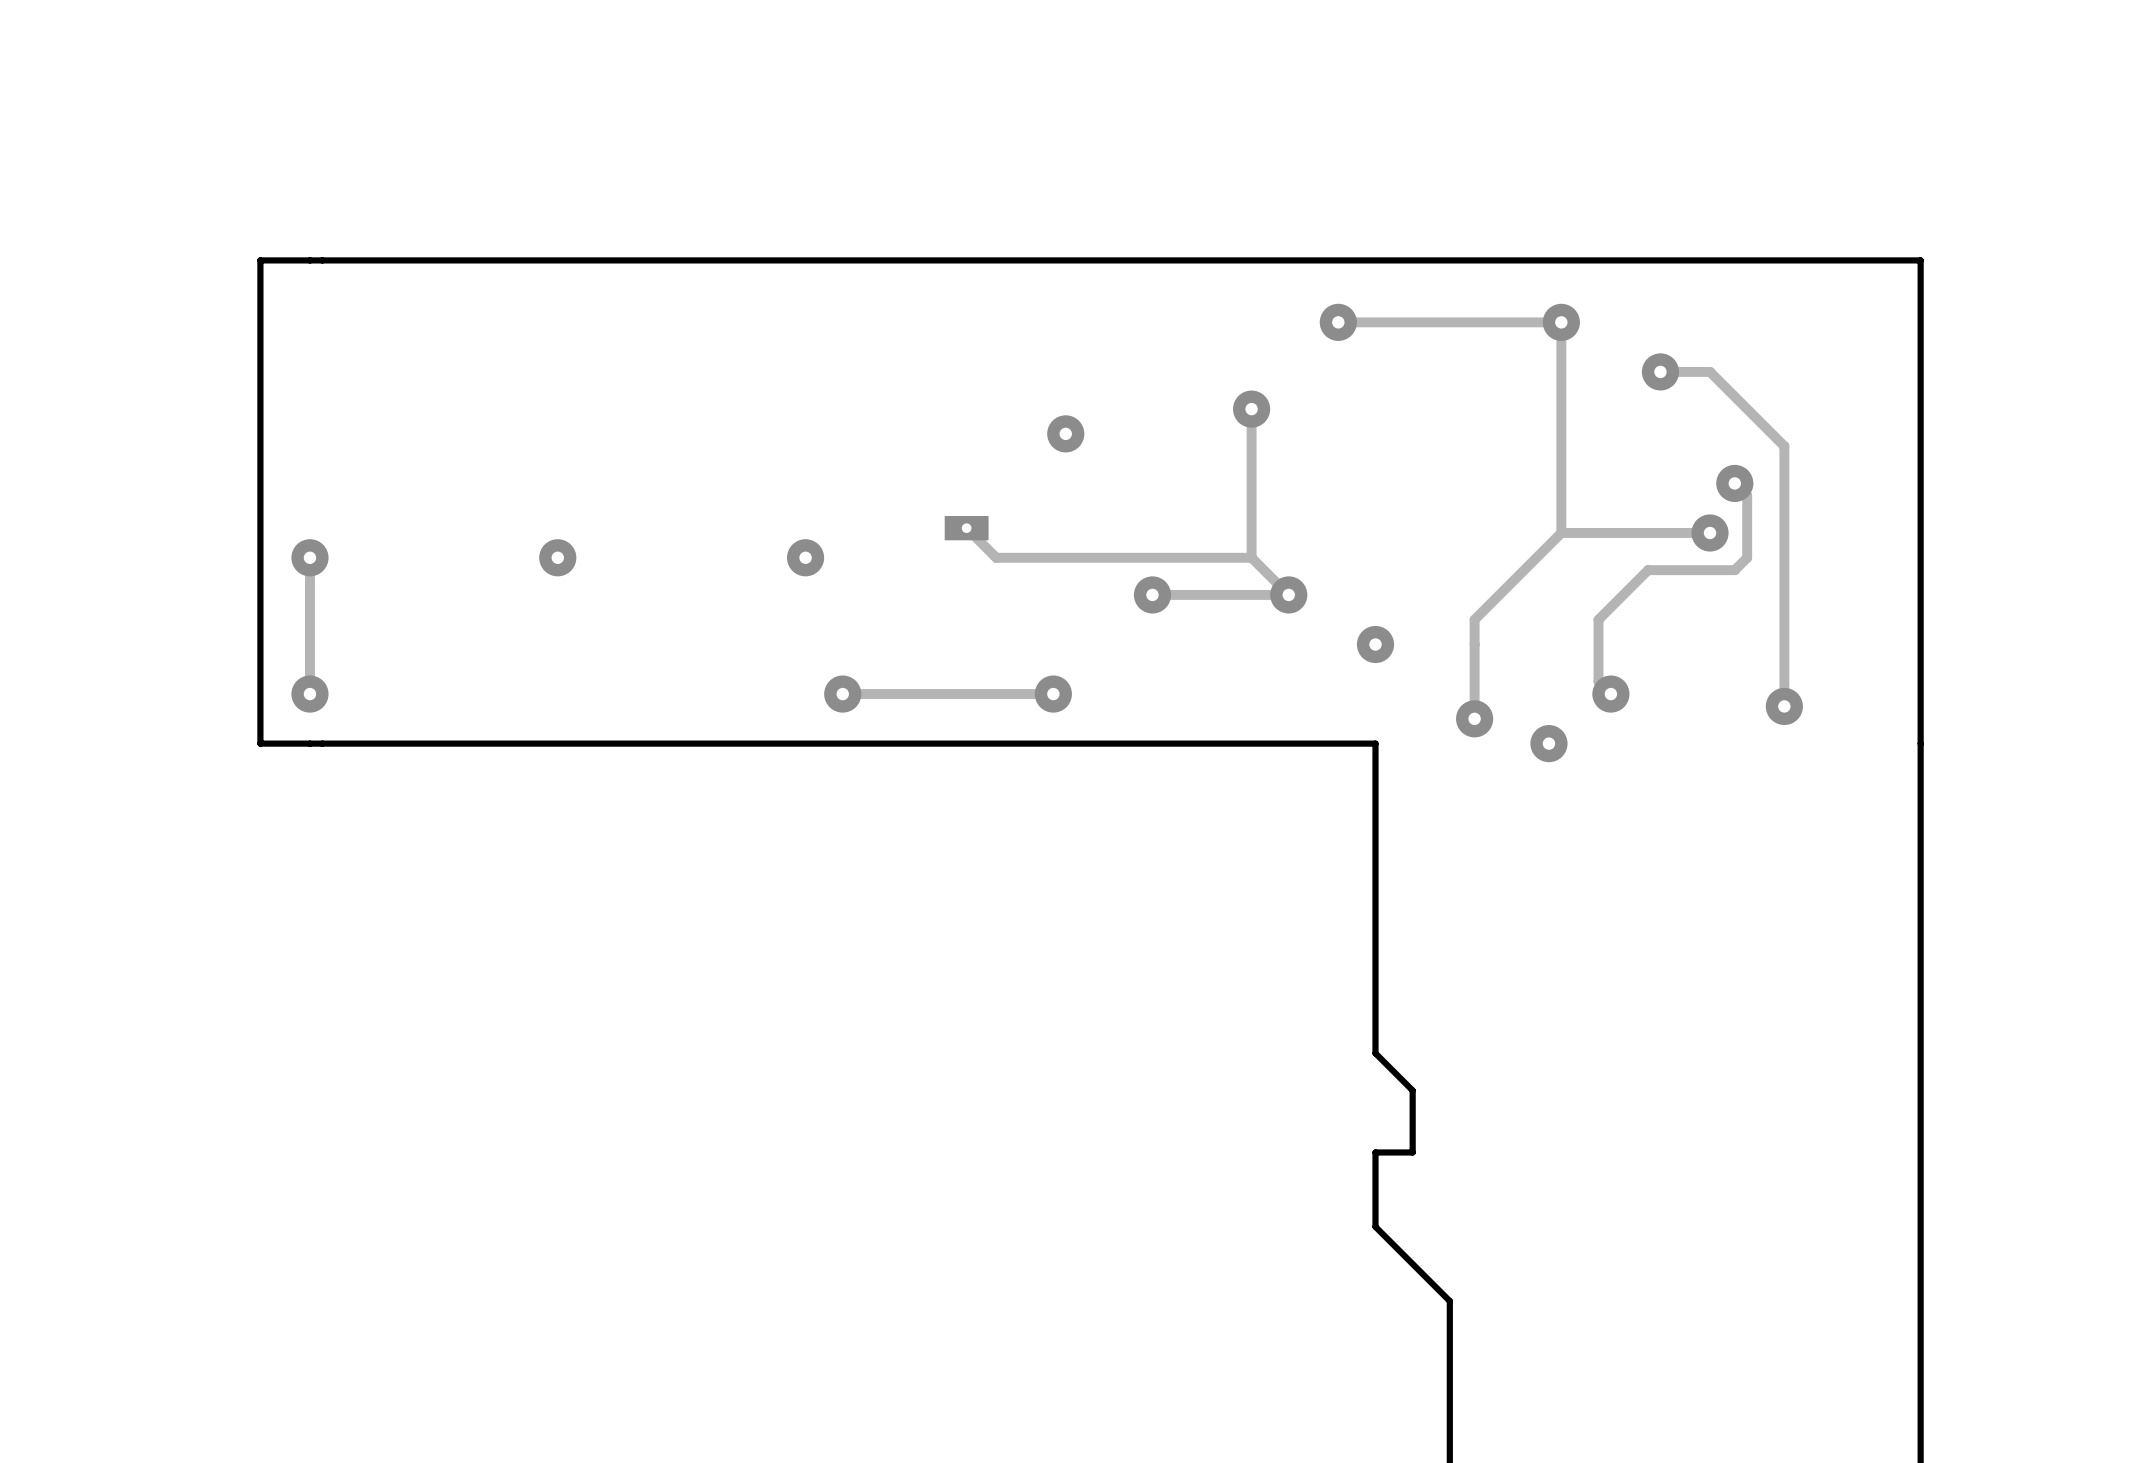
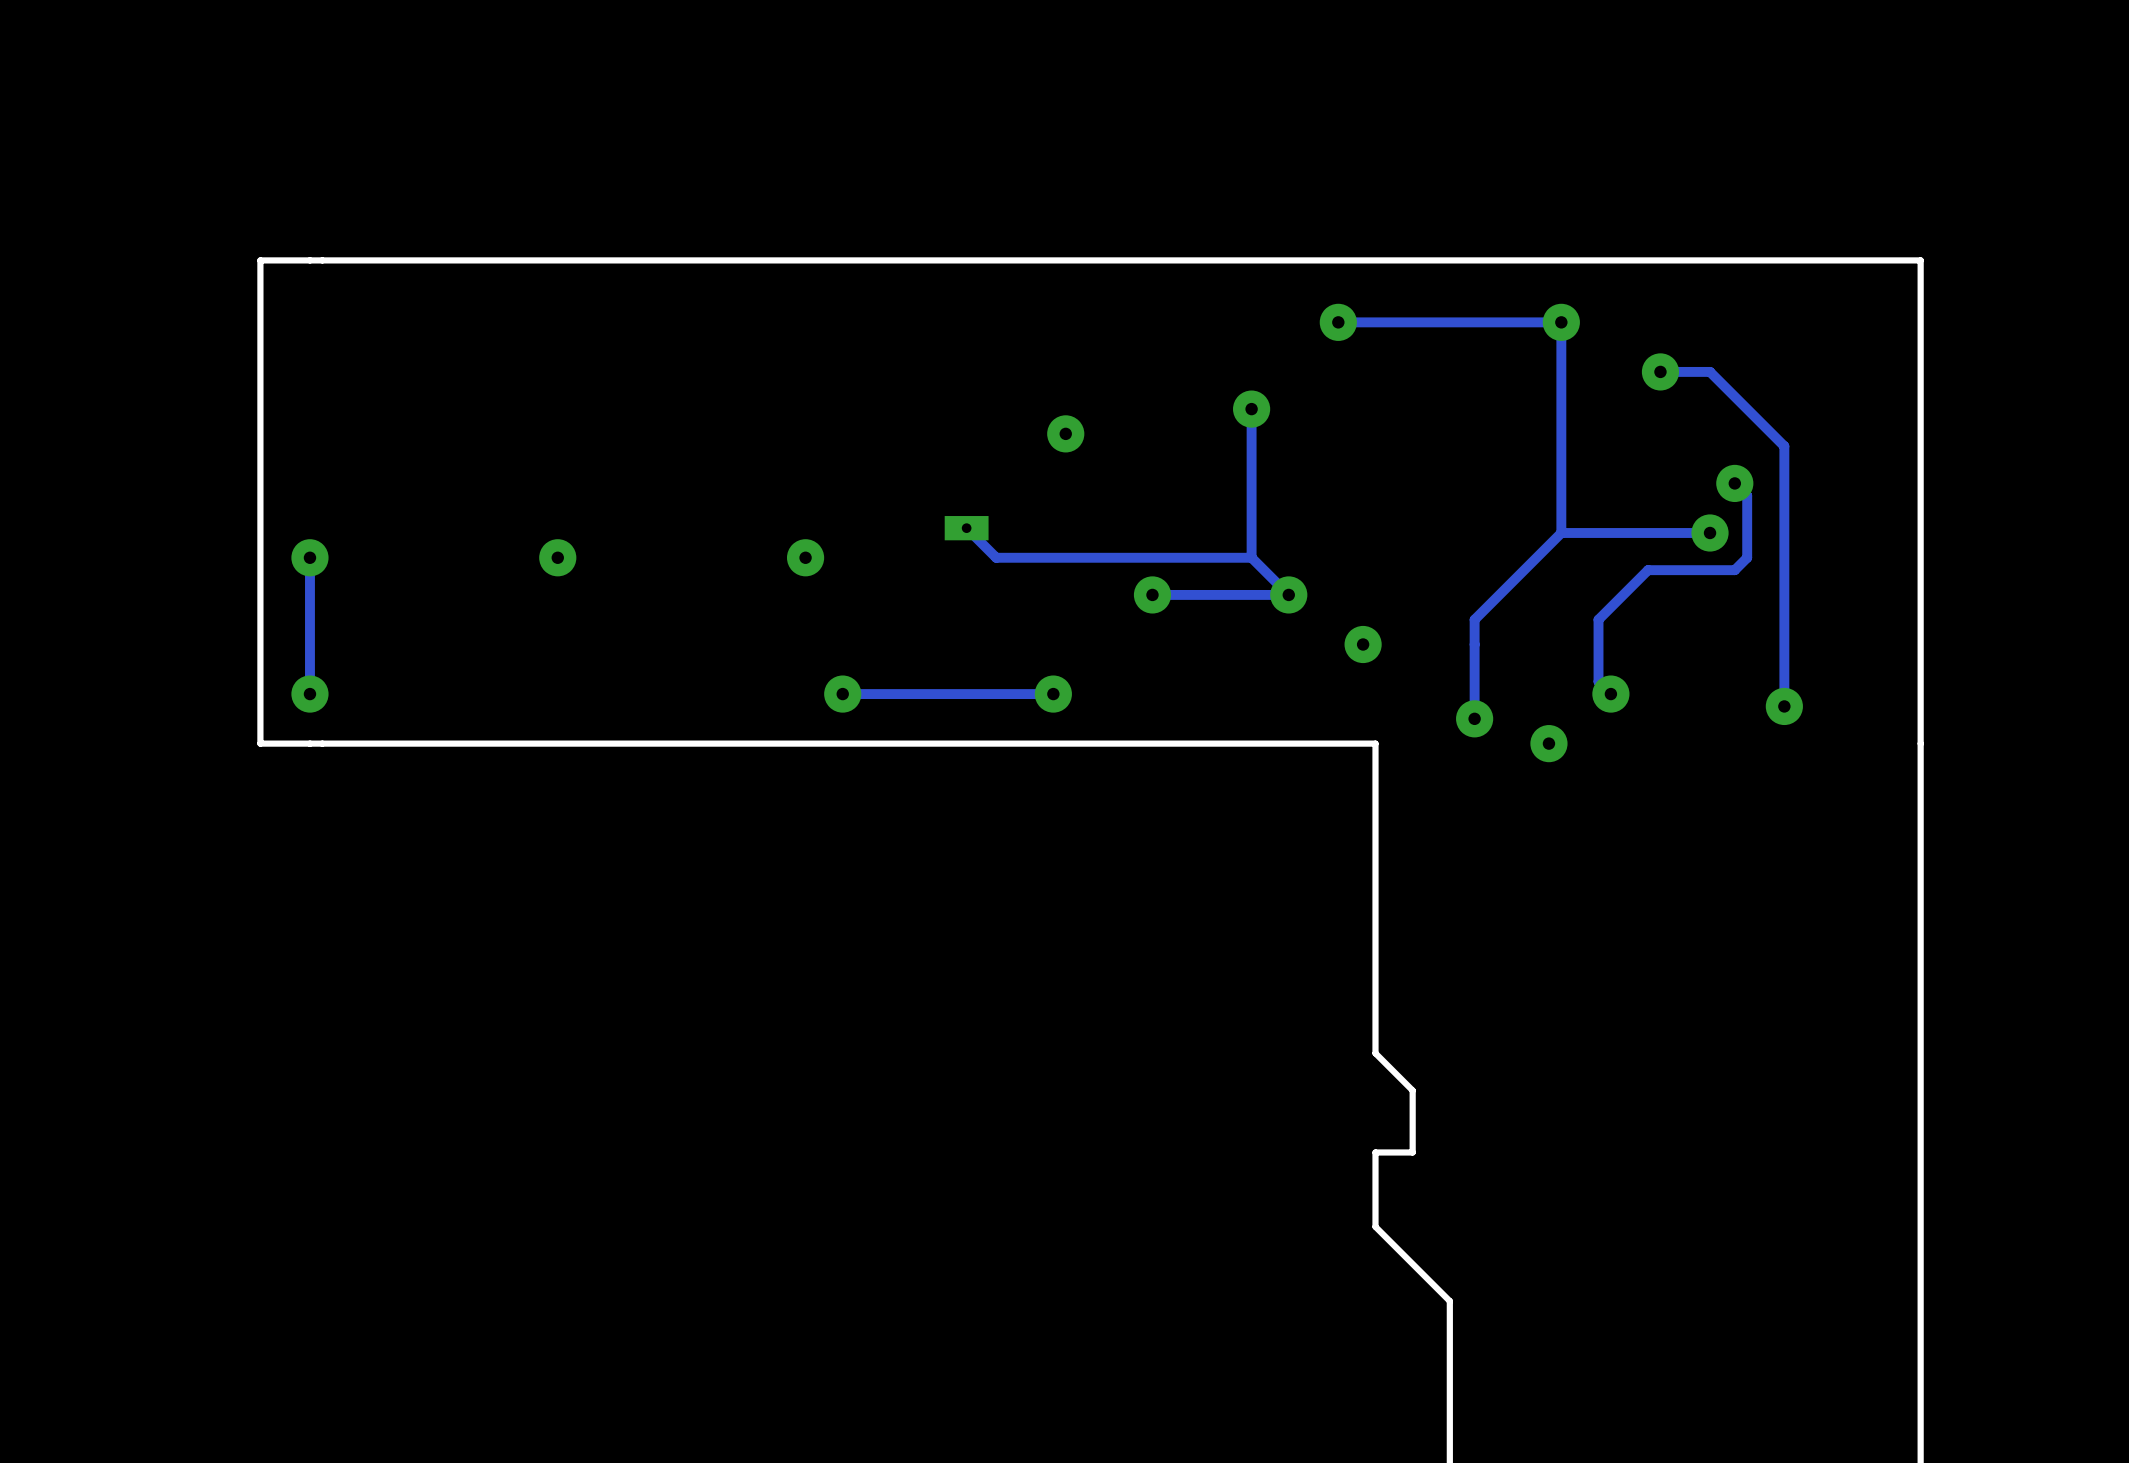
via position: (1375, 644) -> (1363, 644)

